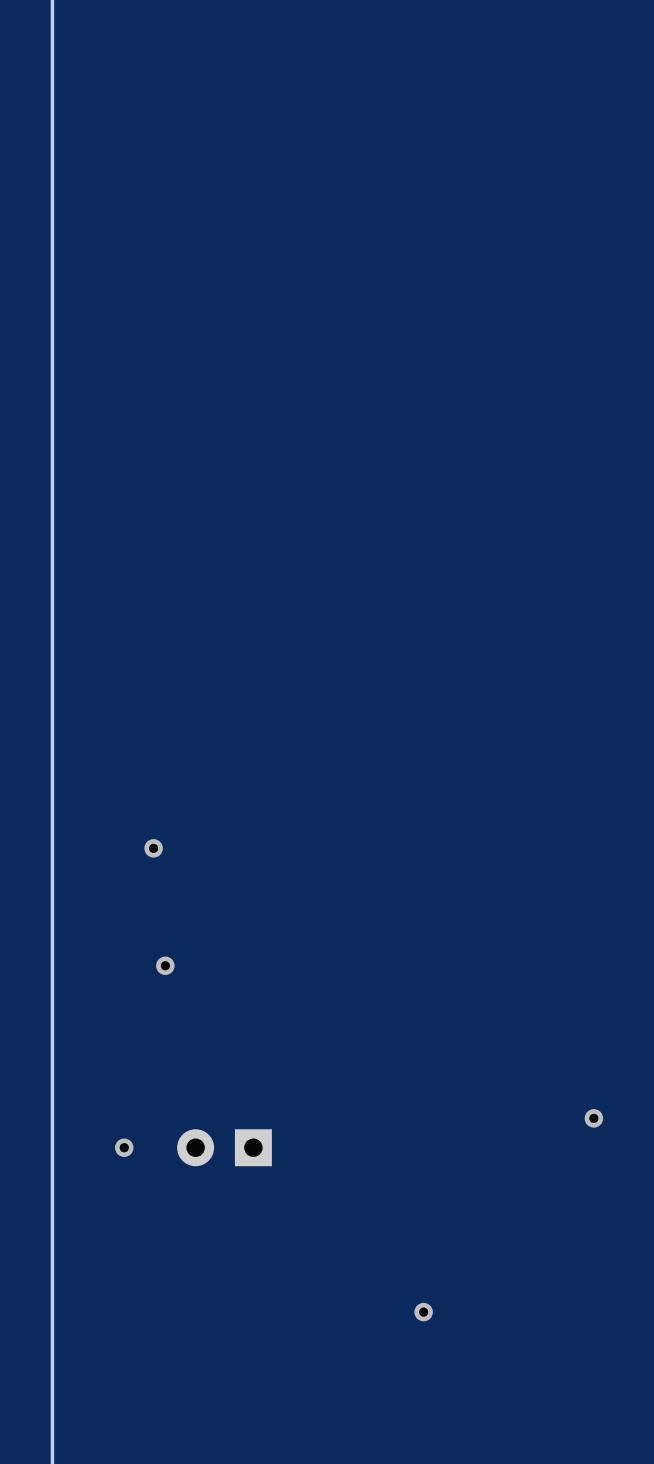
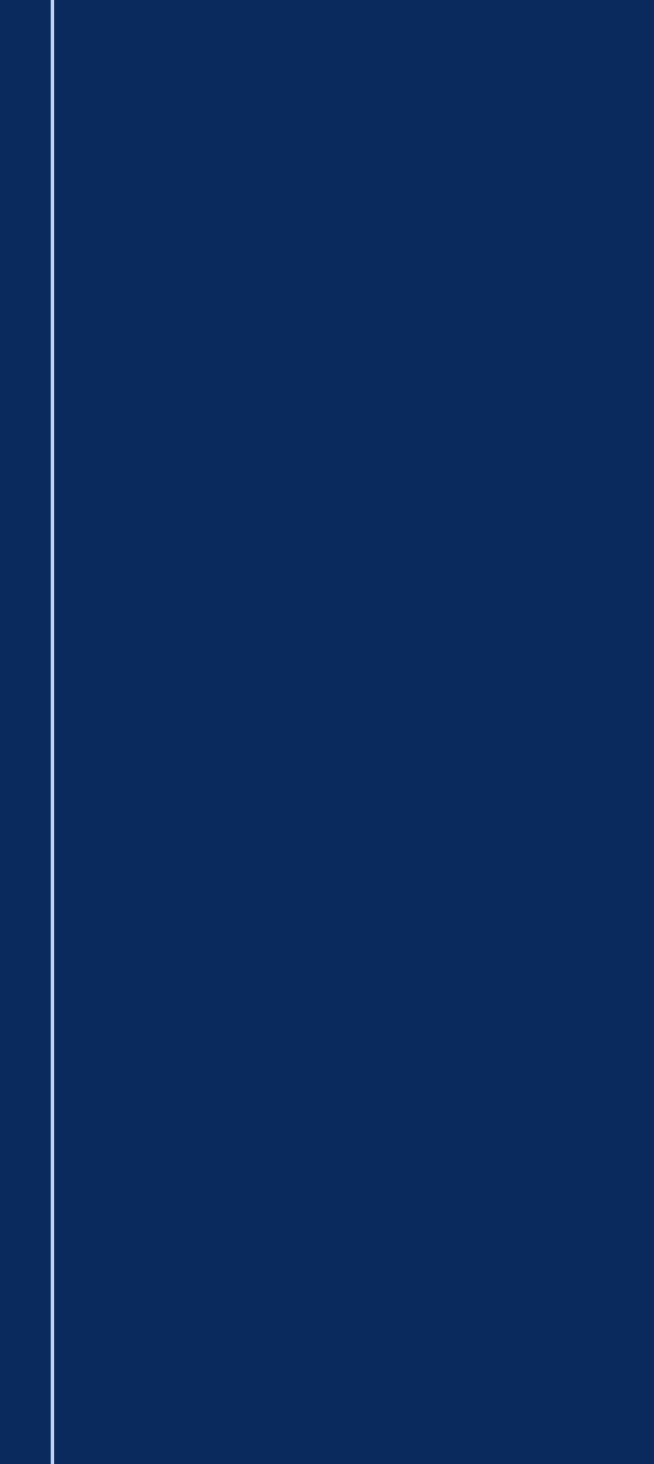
via: (153, 848) -> none
via: (165, 965) -> none
via: (593, 1118) -> none
via: (124, 1147) -> none
part: (224, 1147) -> none
via: (423, 1312) -> none

